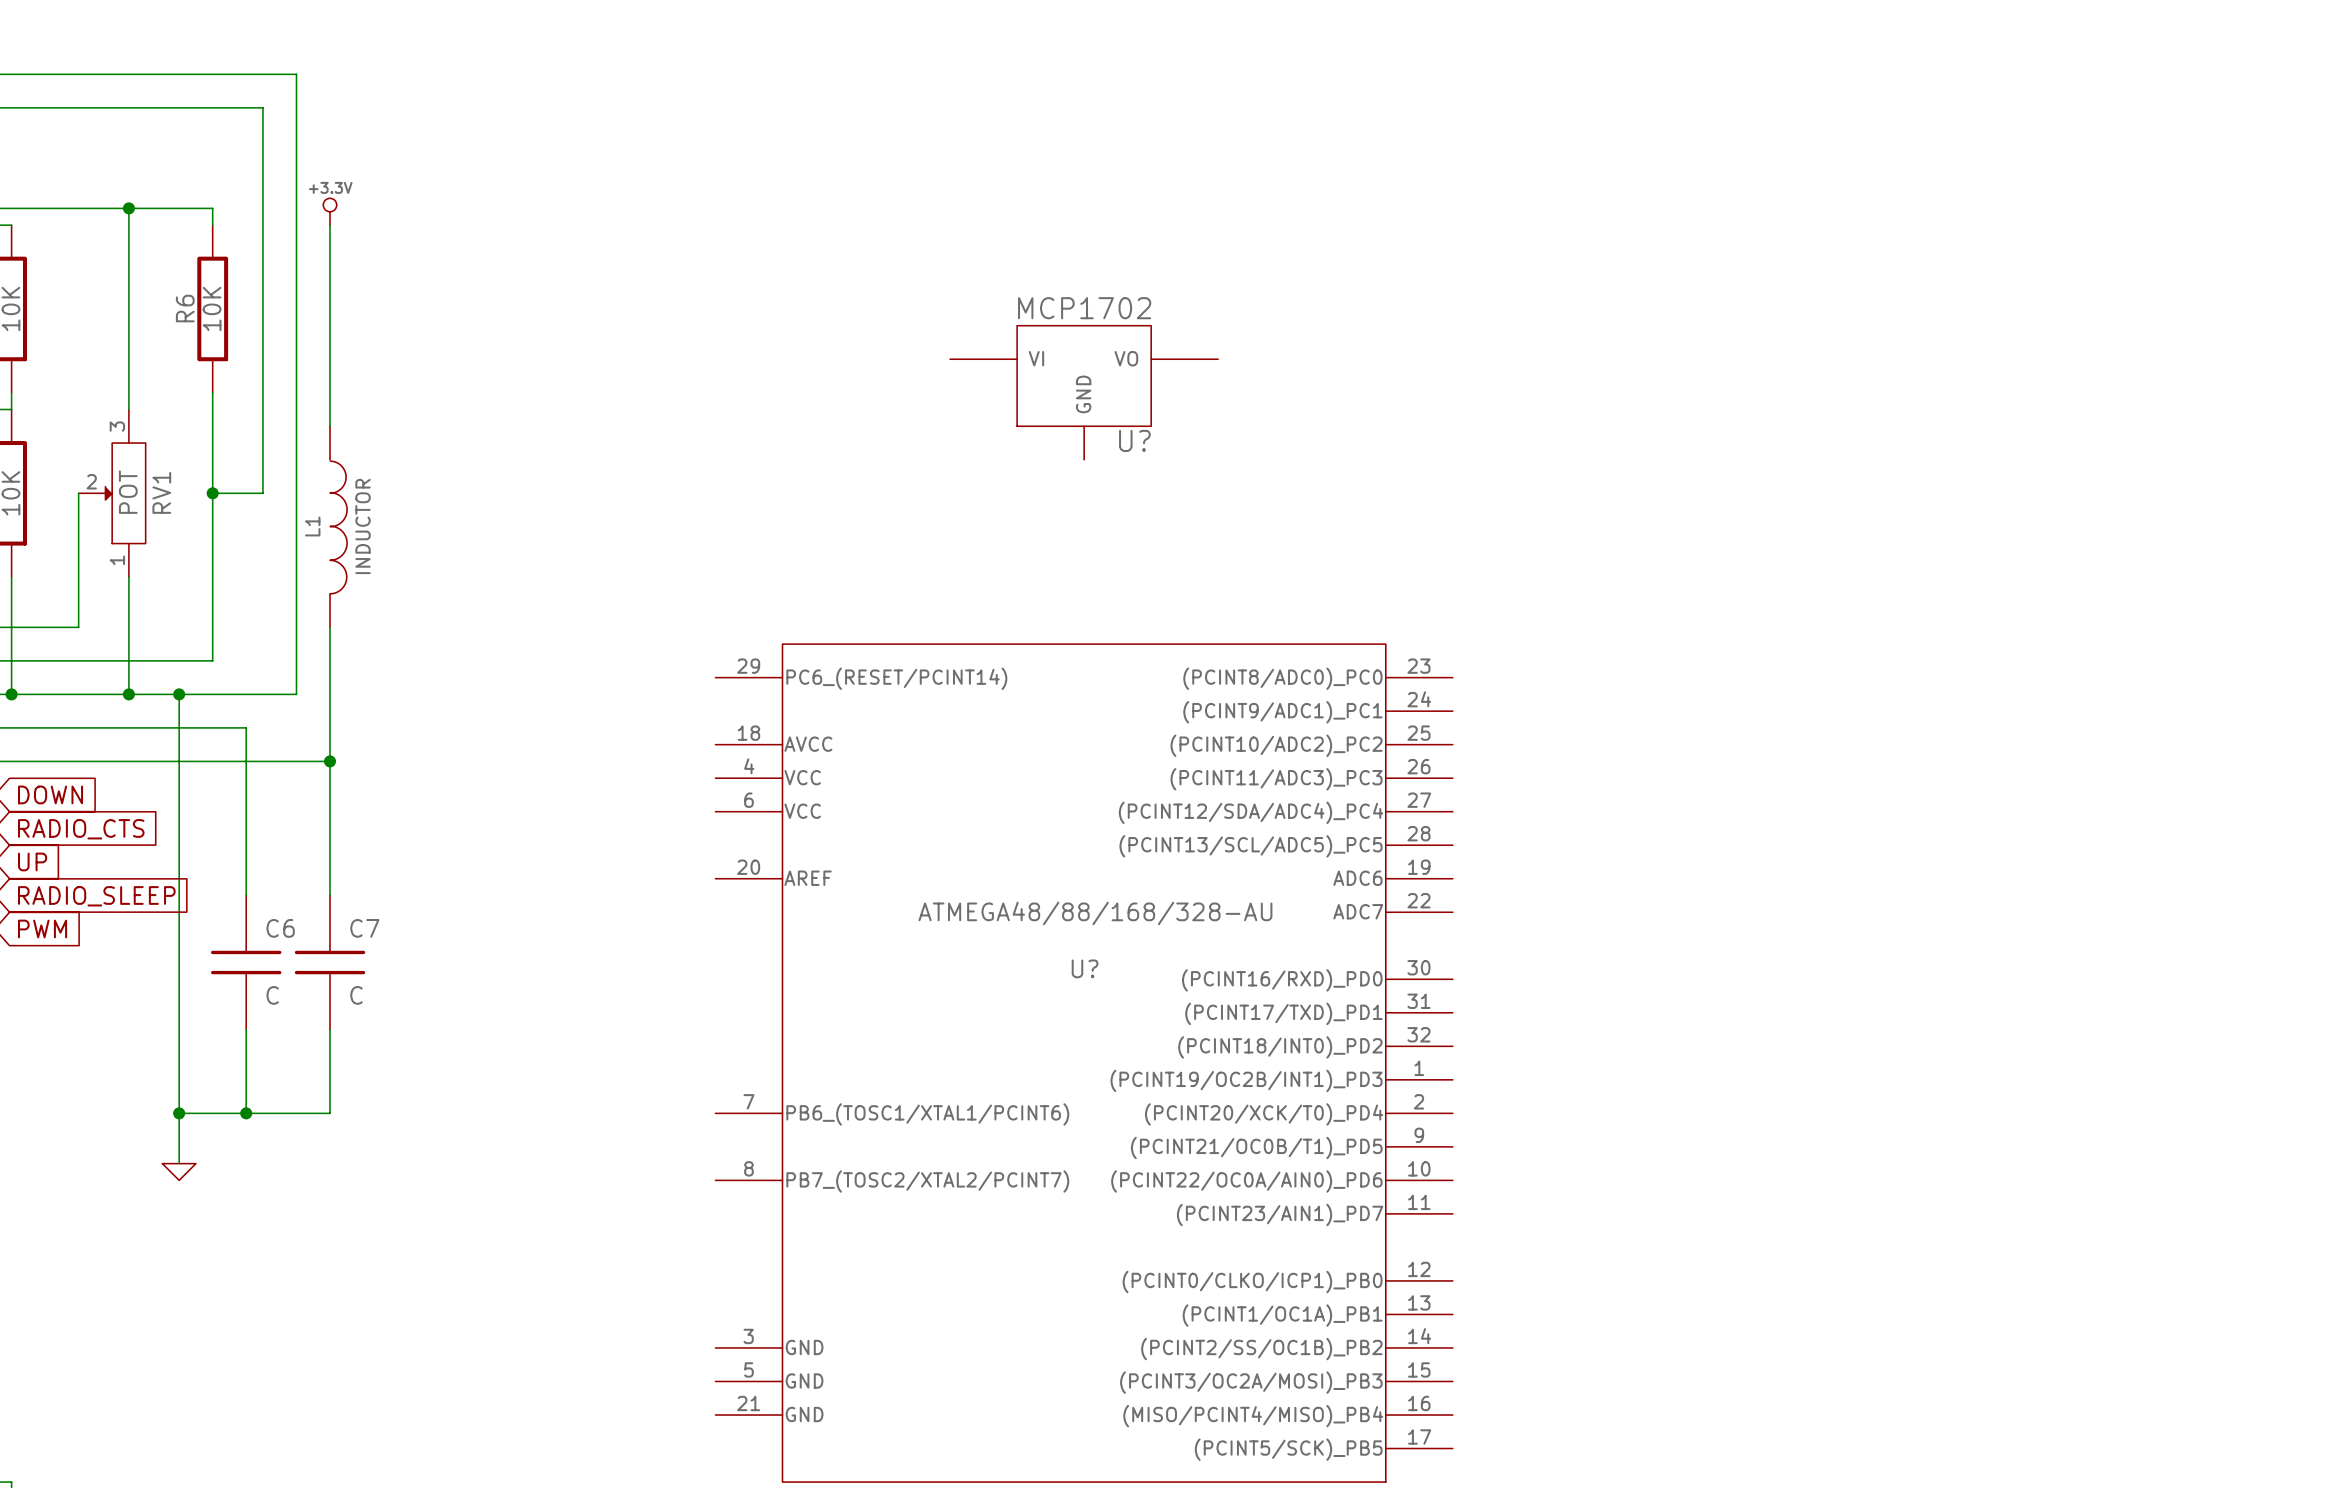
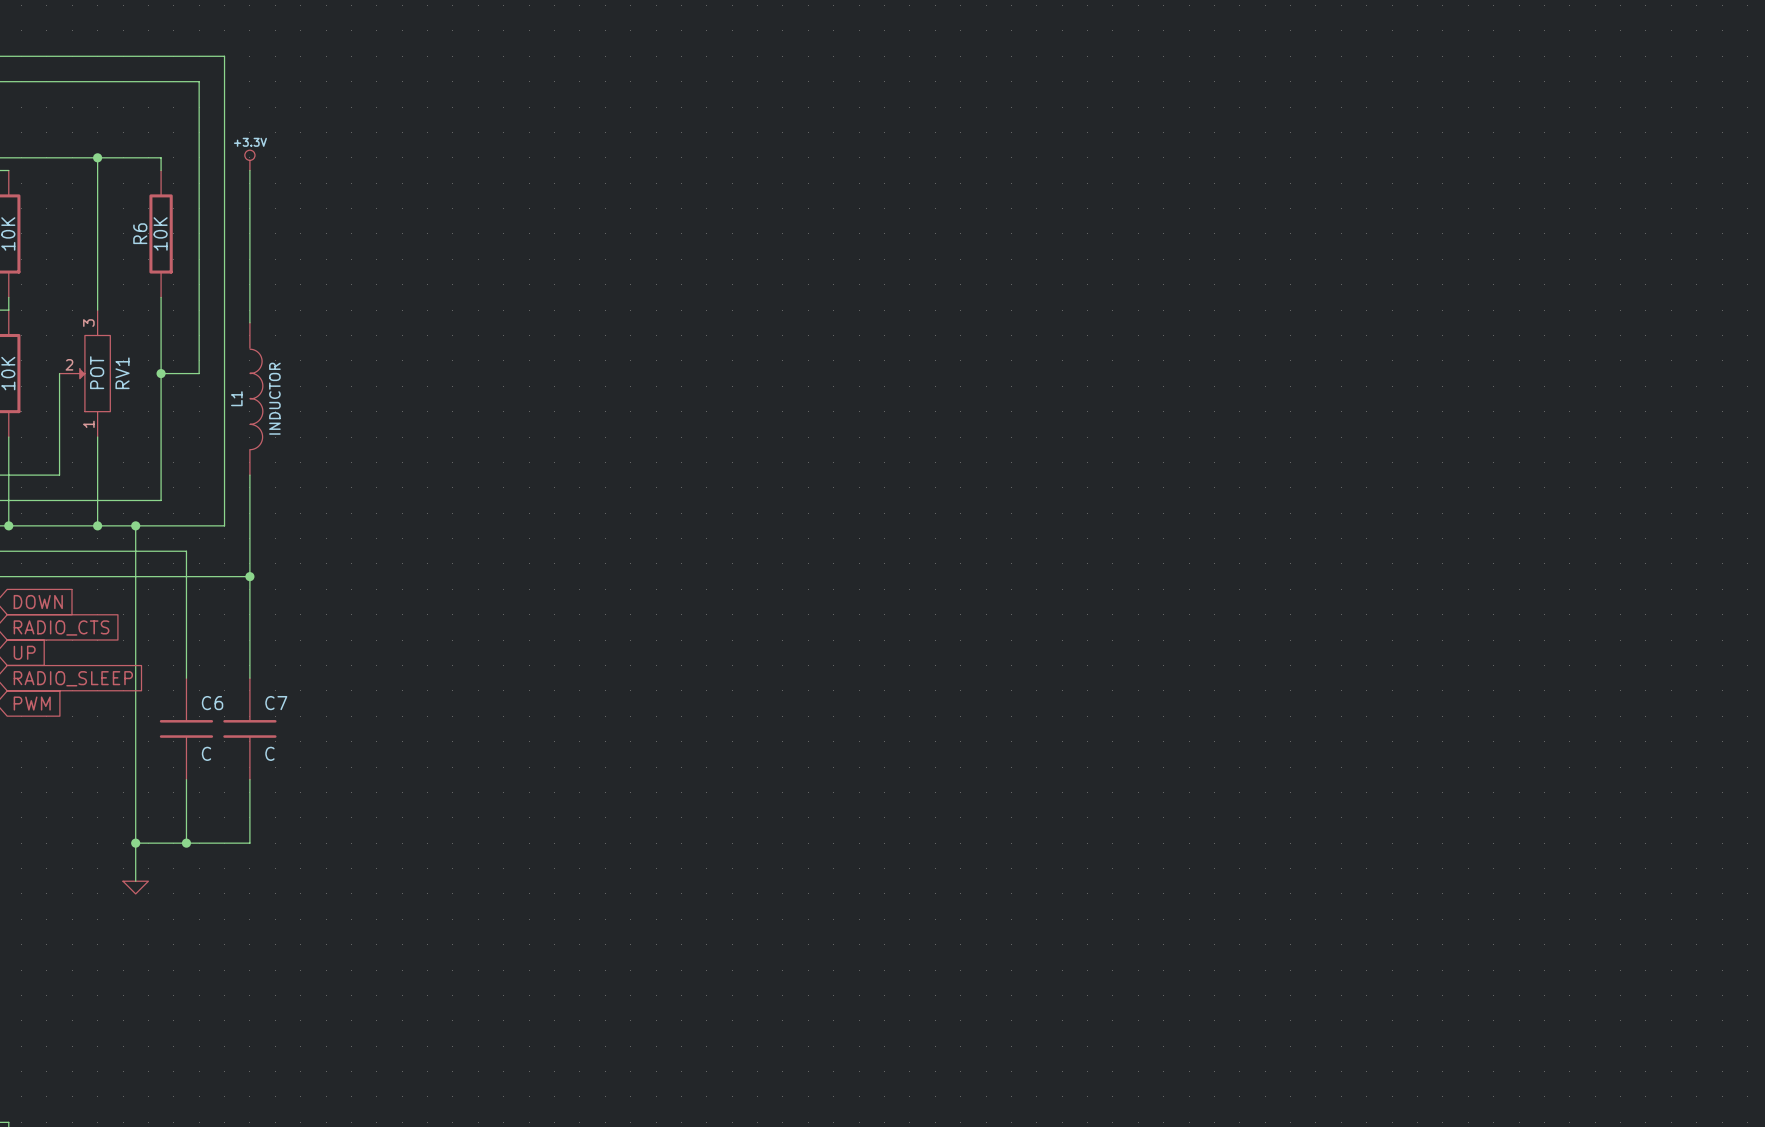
U?: MCP1702 (1084, 392) -> none
U?: ATMEGA48/88/168/328-AU (1084, 1063) -> none

